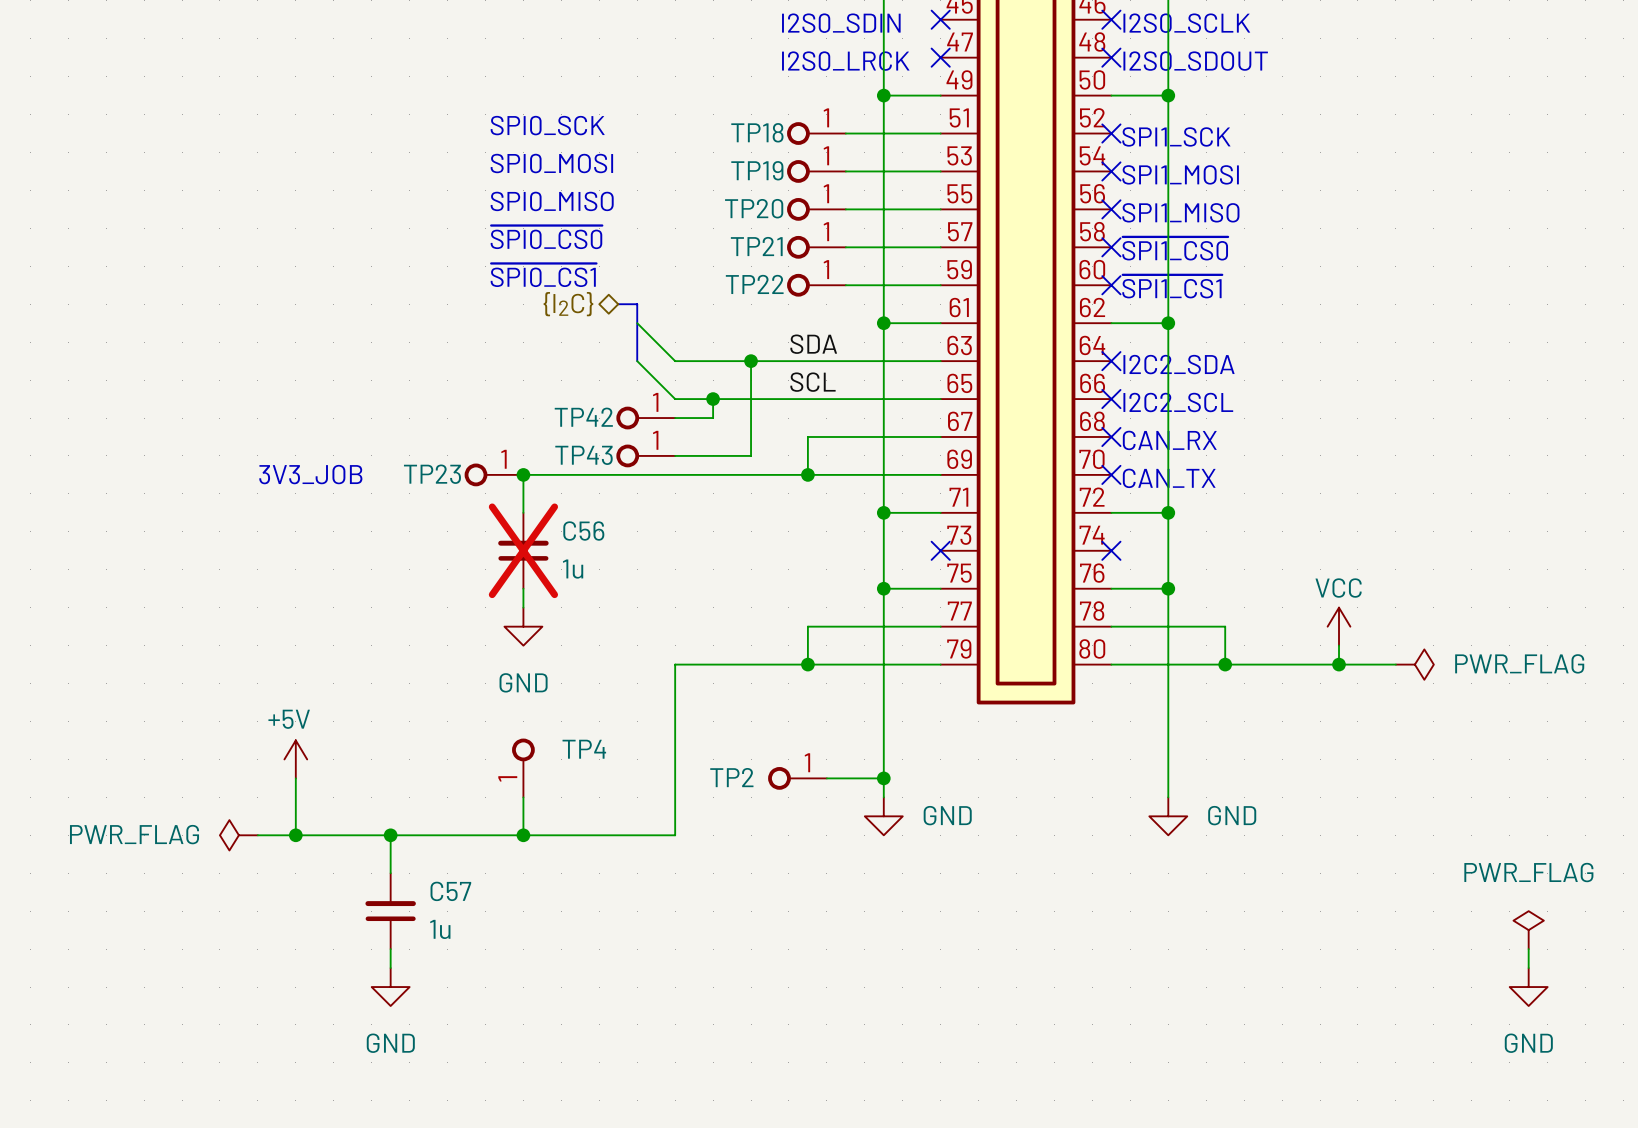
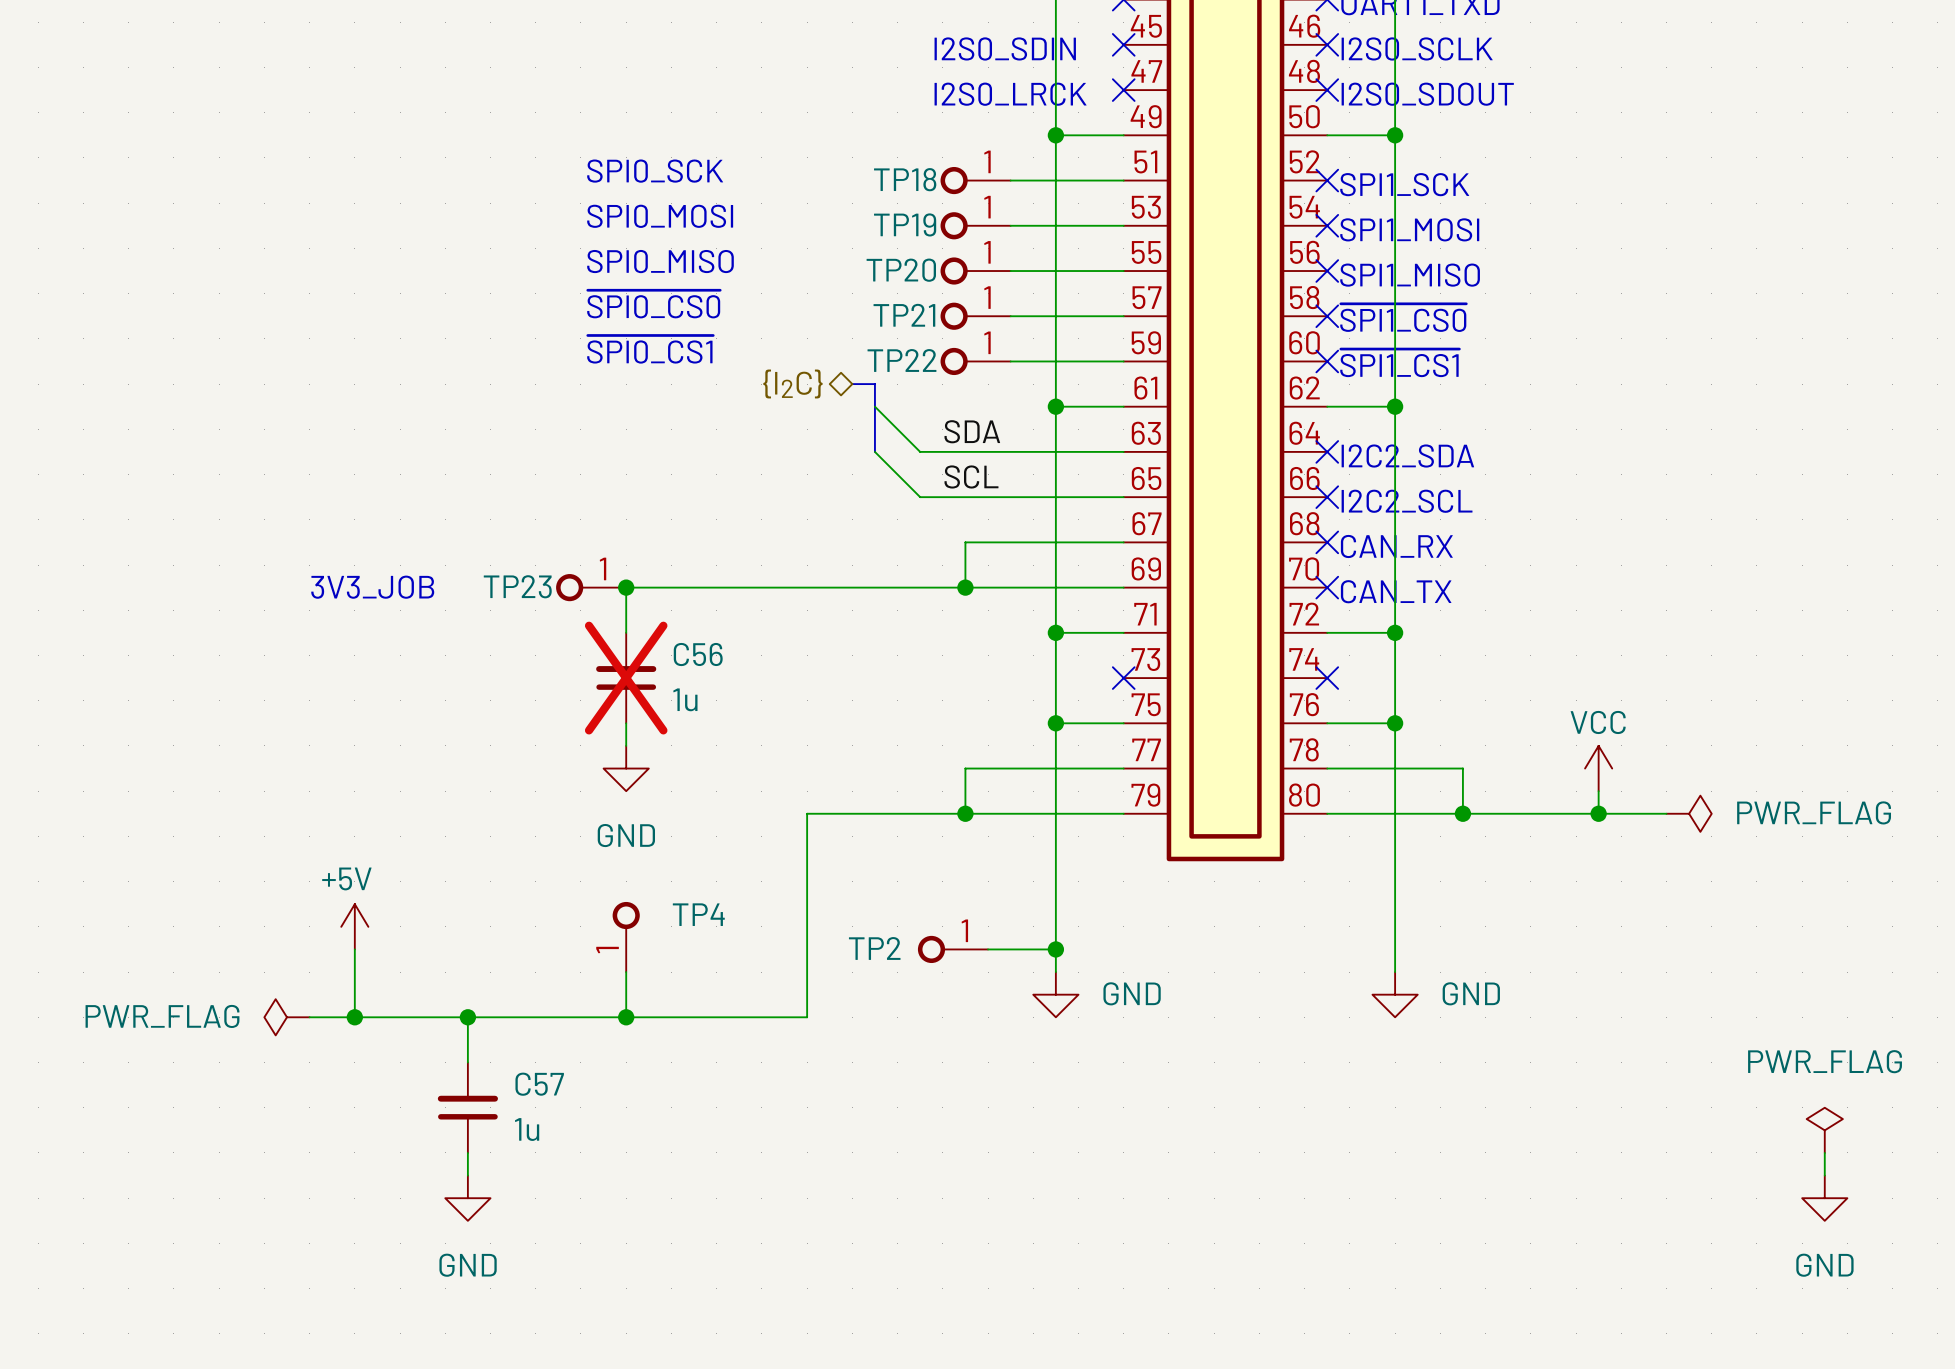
hierarchical label position: {I2C} (568, 304) -> {I2C} (792, 383)
bus: (618, 304) (637, 304) (637, 361) -> (852, 384) (874, 384) (874, 451)
wire: (637, 323) (675, 361) (769, 361) -> (874, 406) (920, 451)
wire: (637, 361) (675, 399) (769, 399) -> (874, 451) (920, 497)
wire: (751, 361) (751, 455) (675, 455) -> none
junction: (751, 361) -> none
wire: (713, 399) (713, 418) (675, 418) -> none
junction: (713, 399) -> none
TP42: (645, 418) -> none
TP43: (645, 455) -> none

